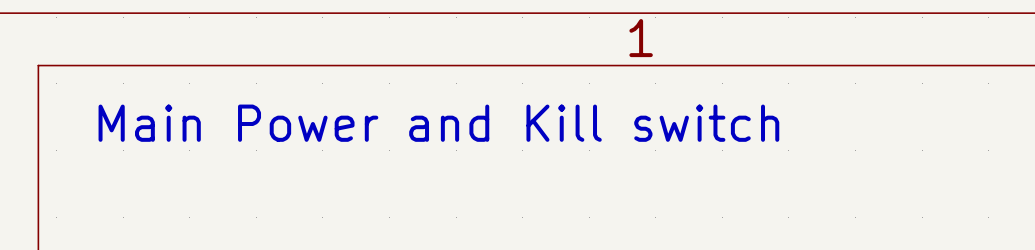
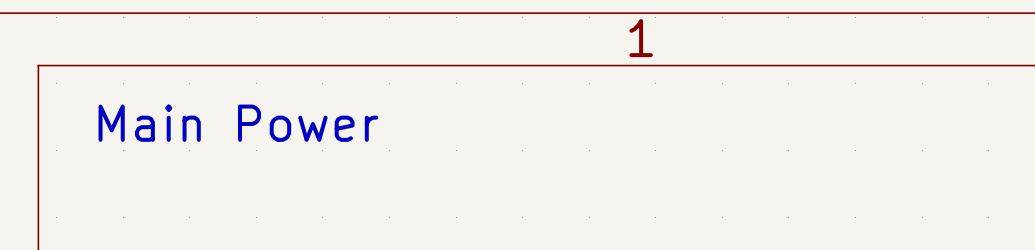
text: Main Power and Kill switch (438, 123) -> Main Power (238, 123)

